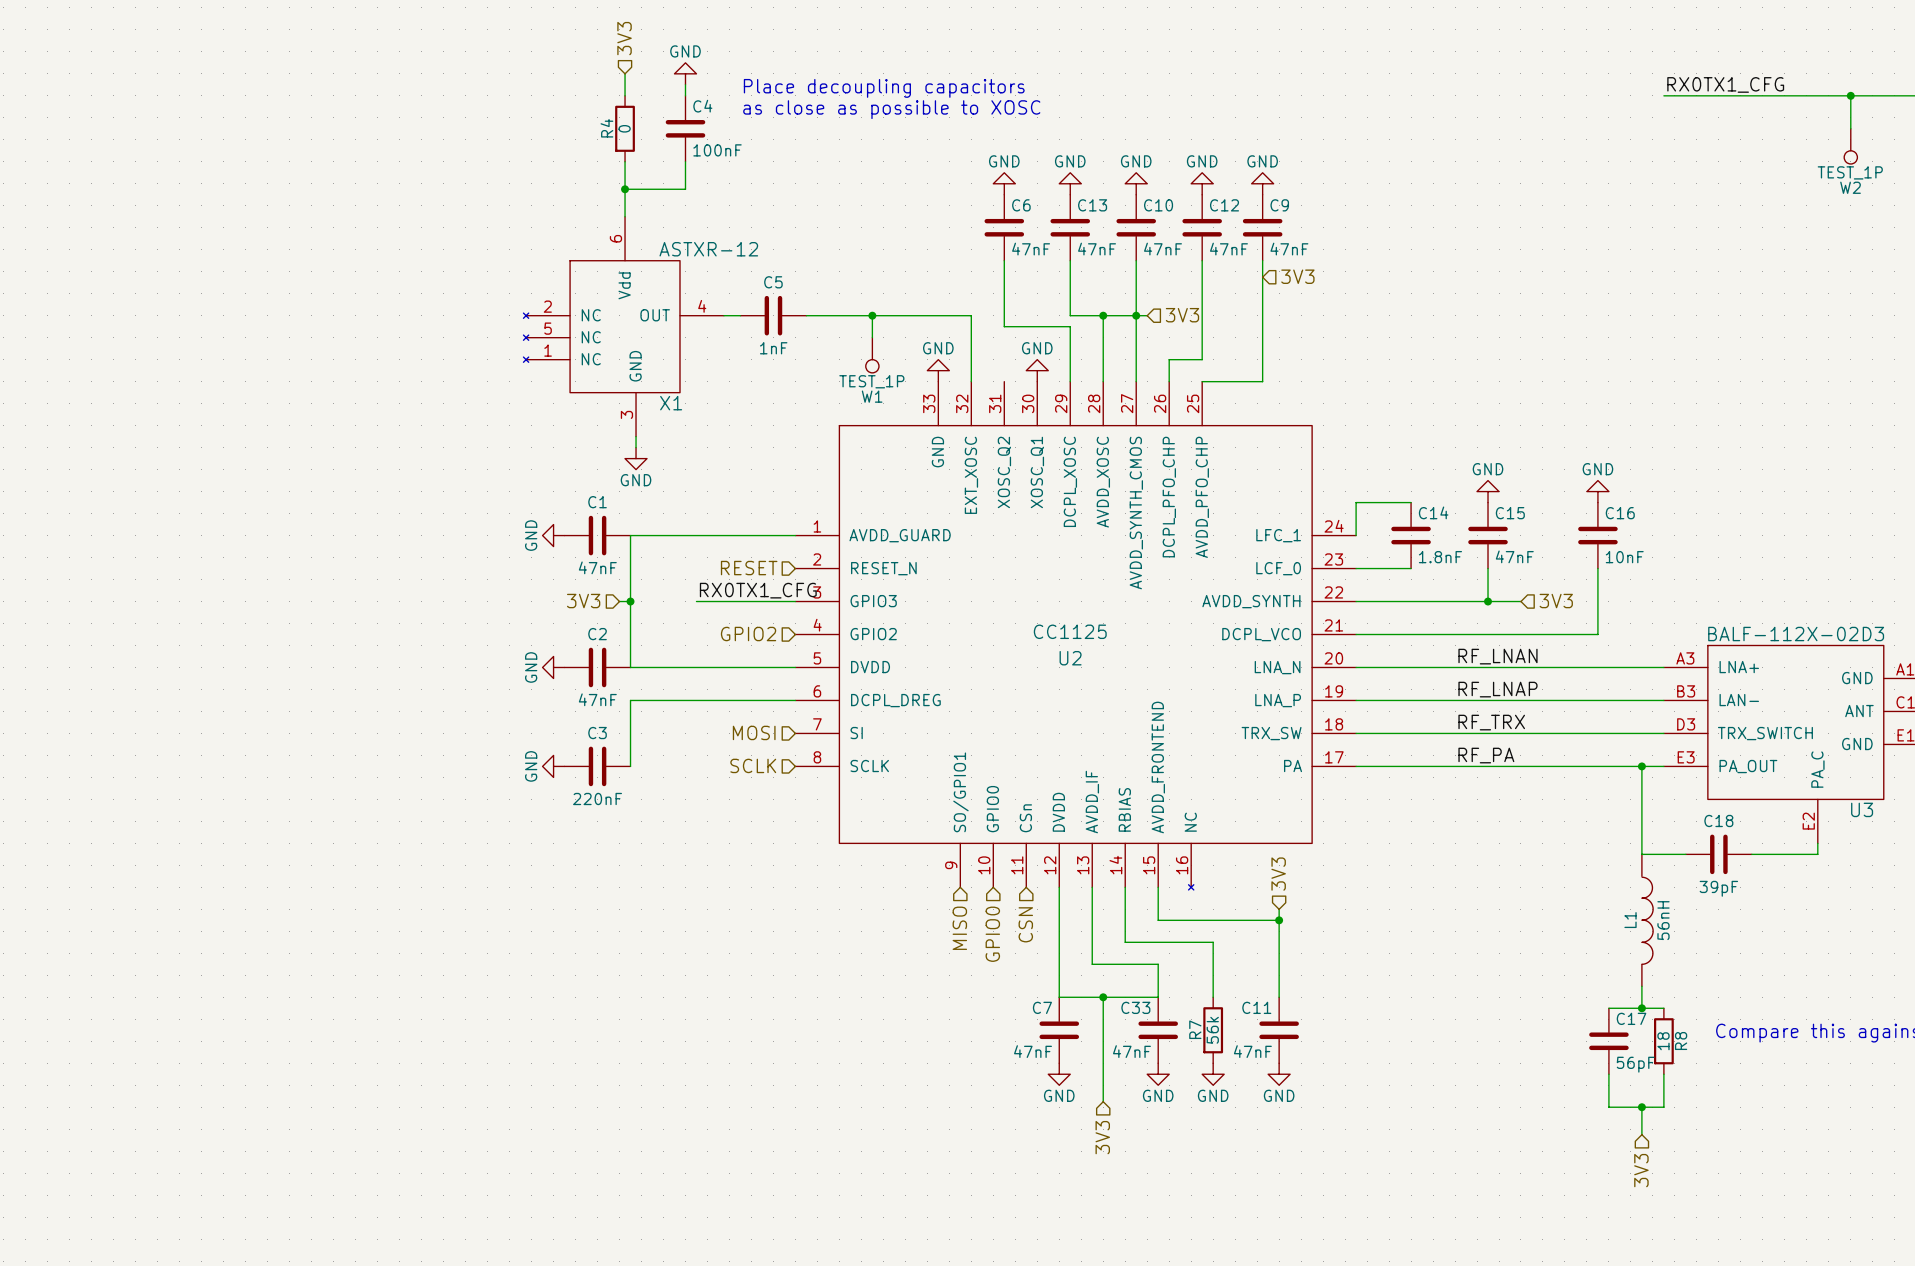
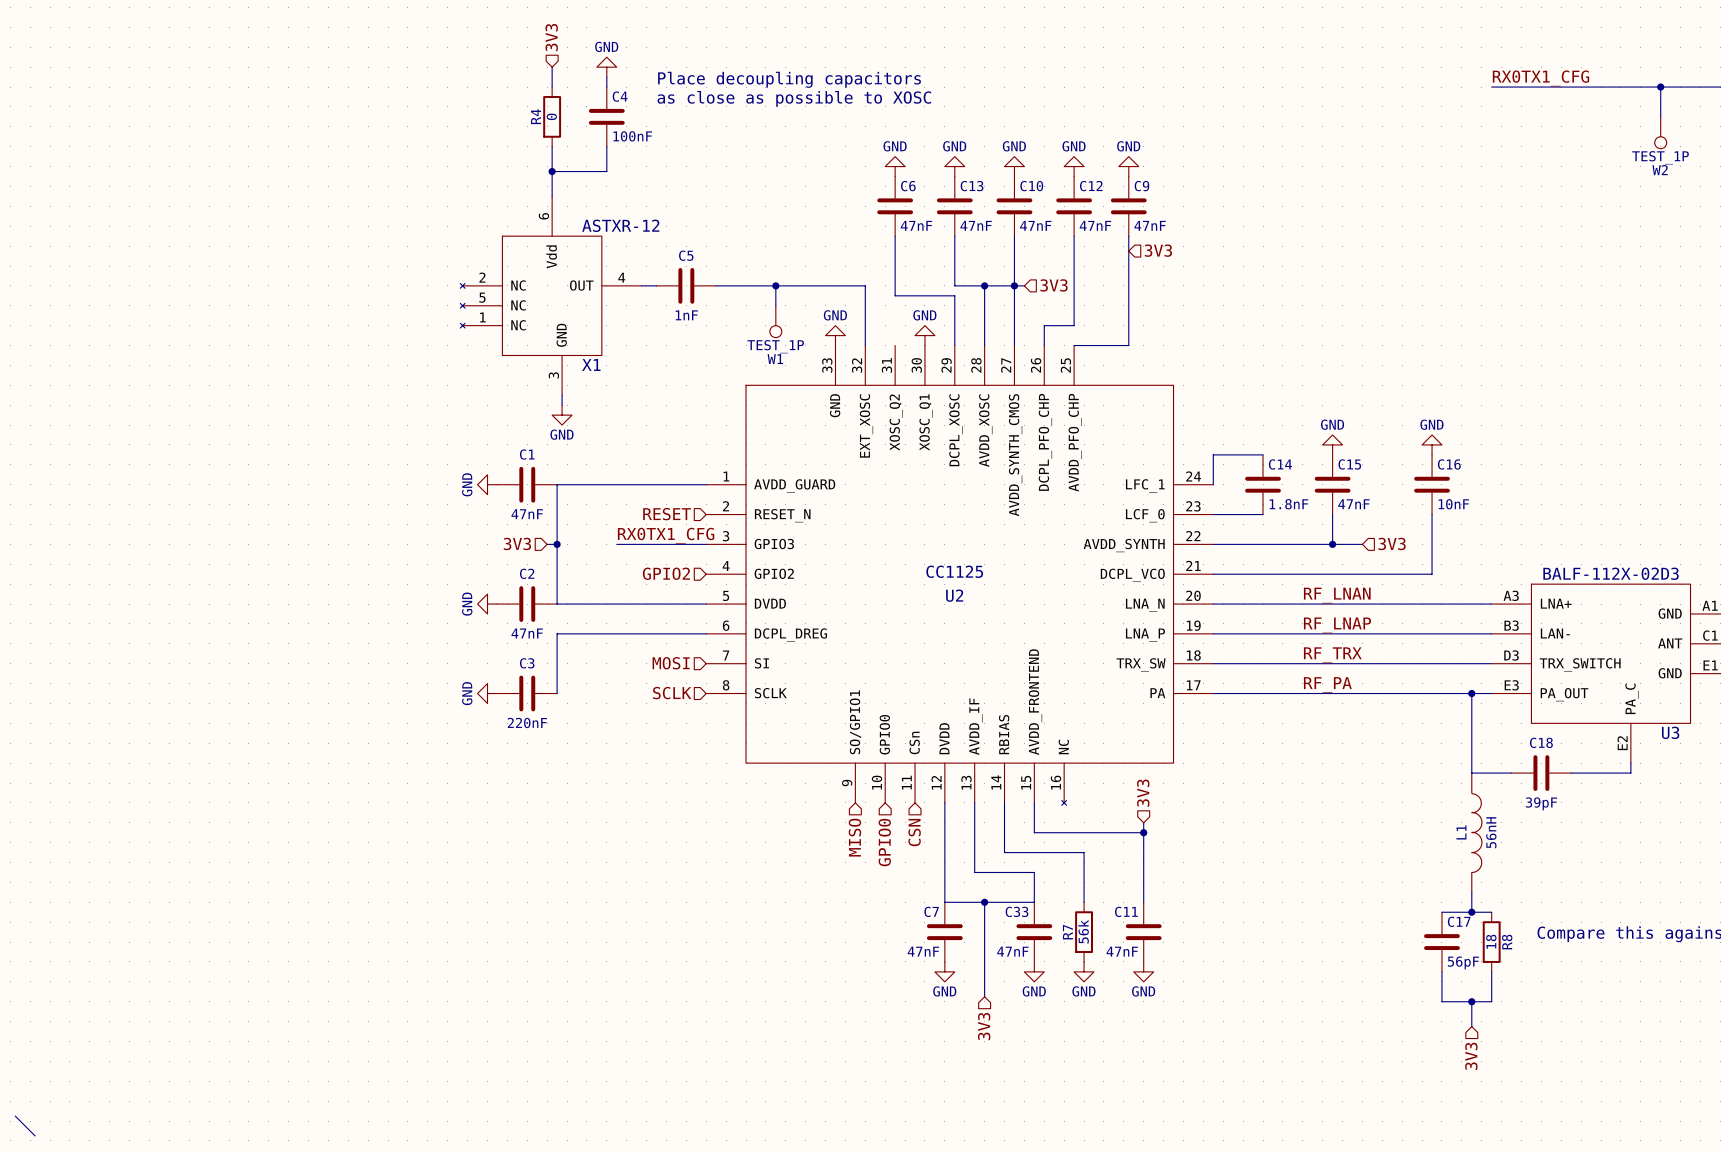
bus: none -> (15, 1116) (35, 1135)

